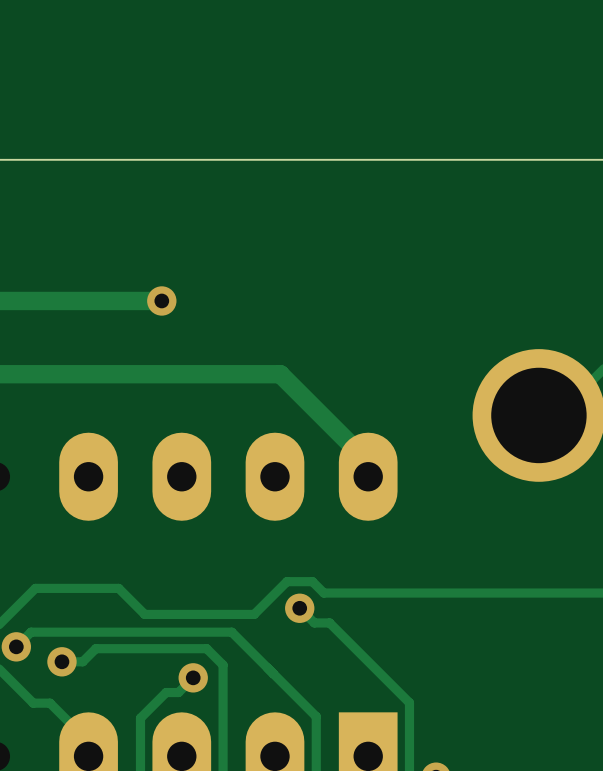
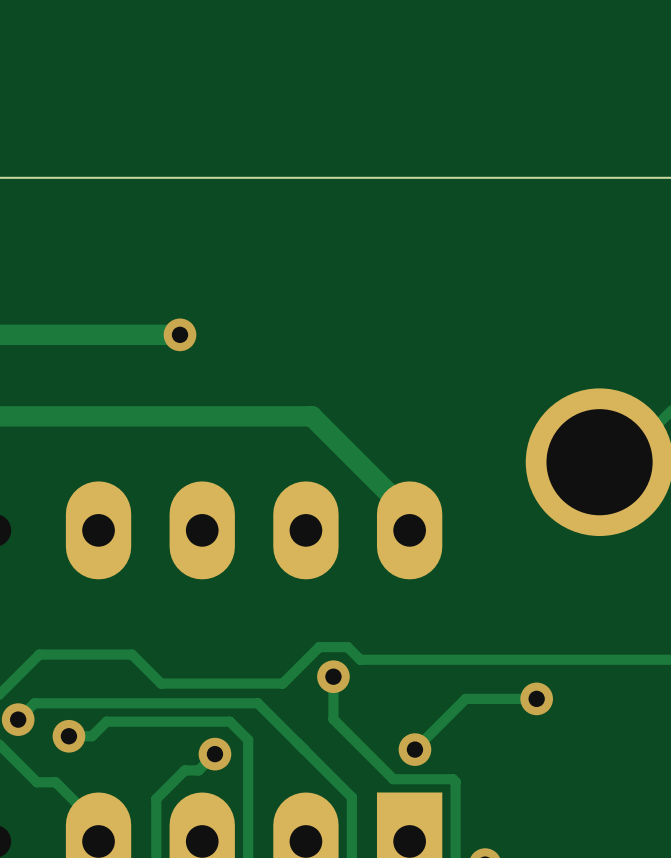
track: (299, 608) (314, 622) (329, 622) (407, 700) -> (333, 676) (333, 719) (393, 779) (452, 779)
track: none -> (536, 698) (465, 698) (414, 749)
via: none -> (536, 698)
via: none -> (414, 749)

